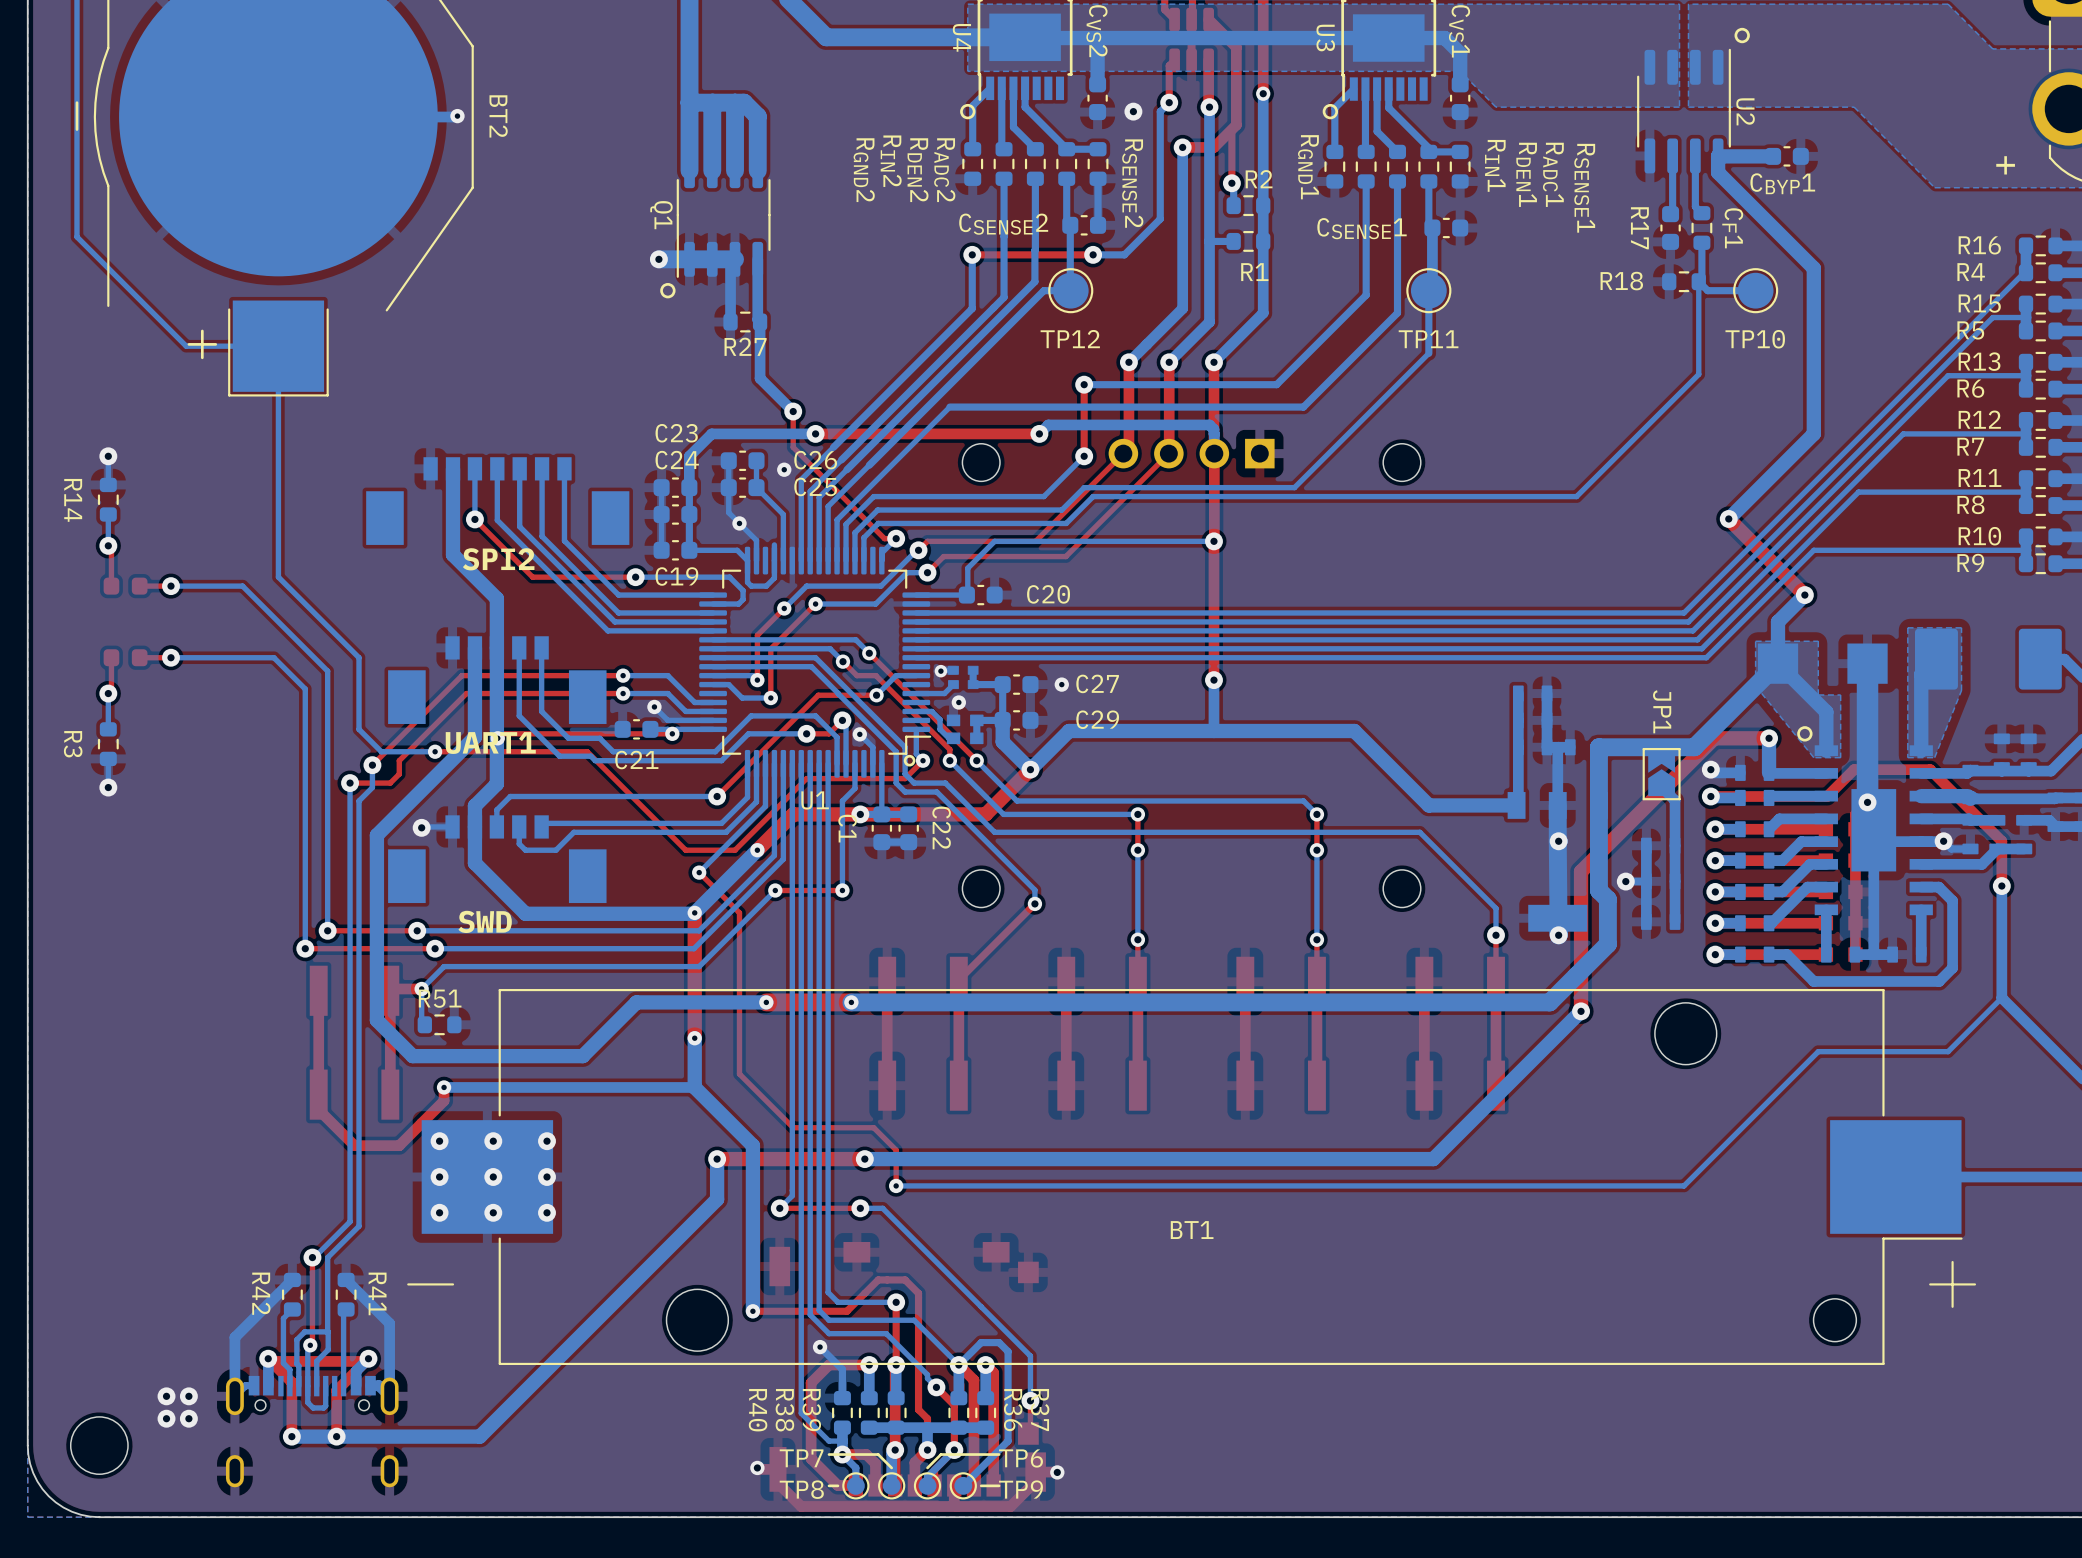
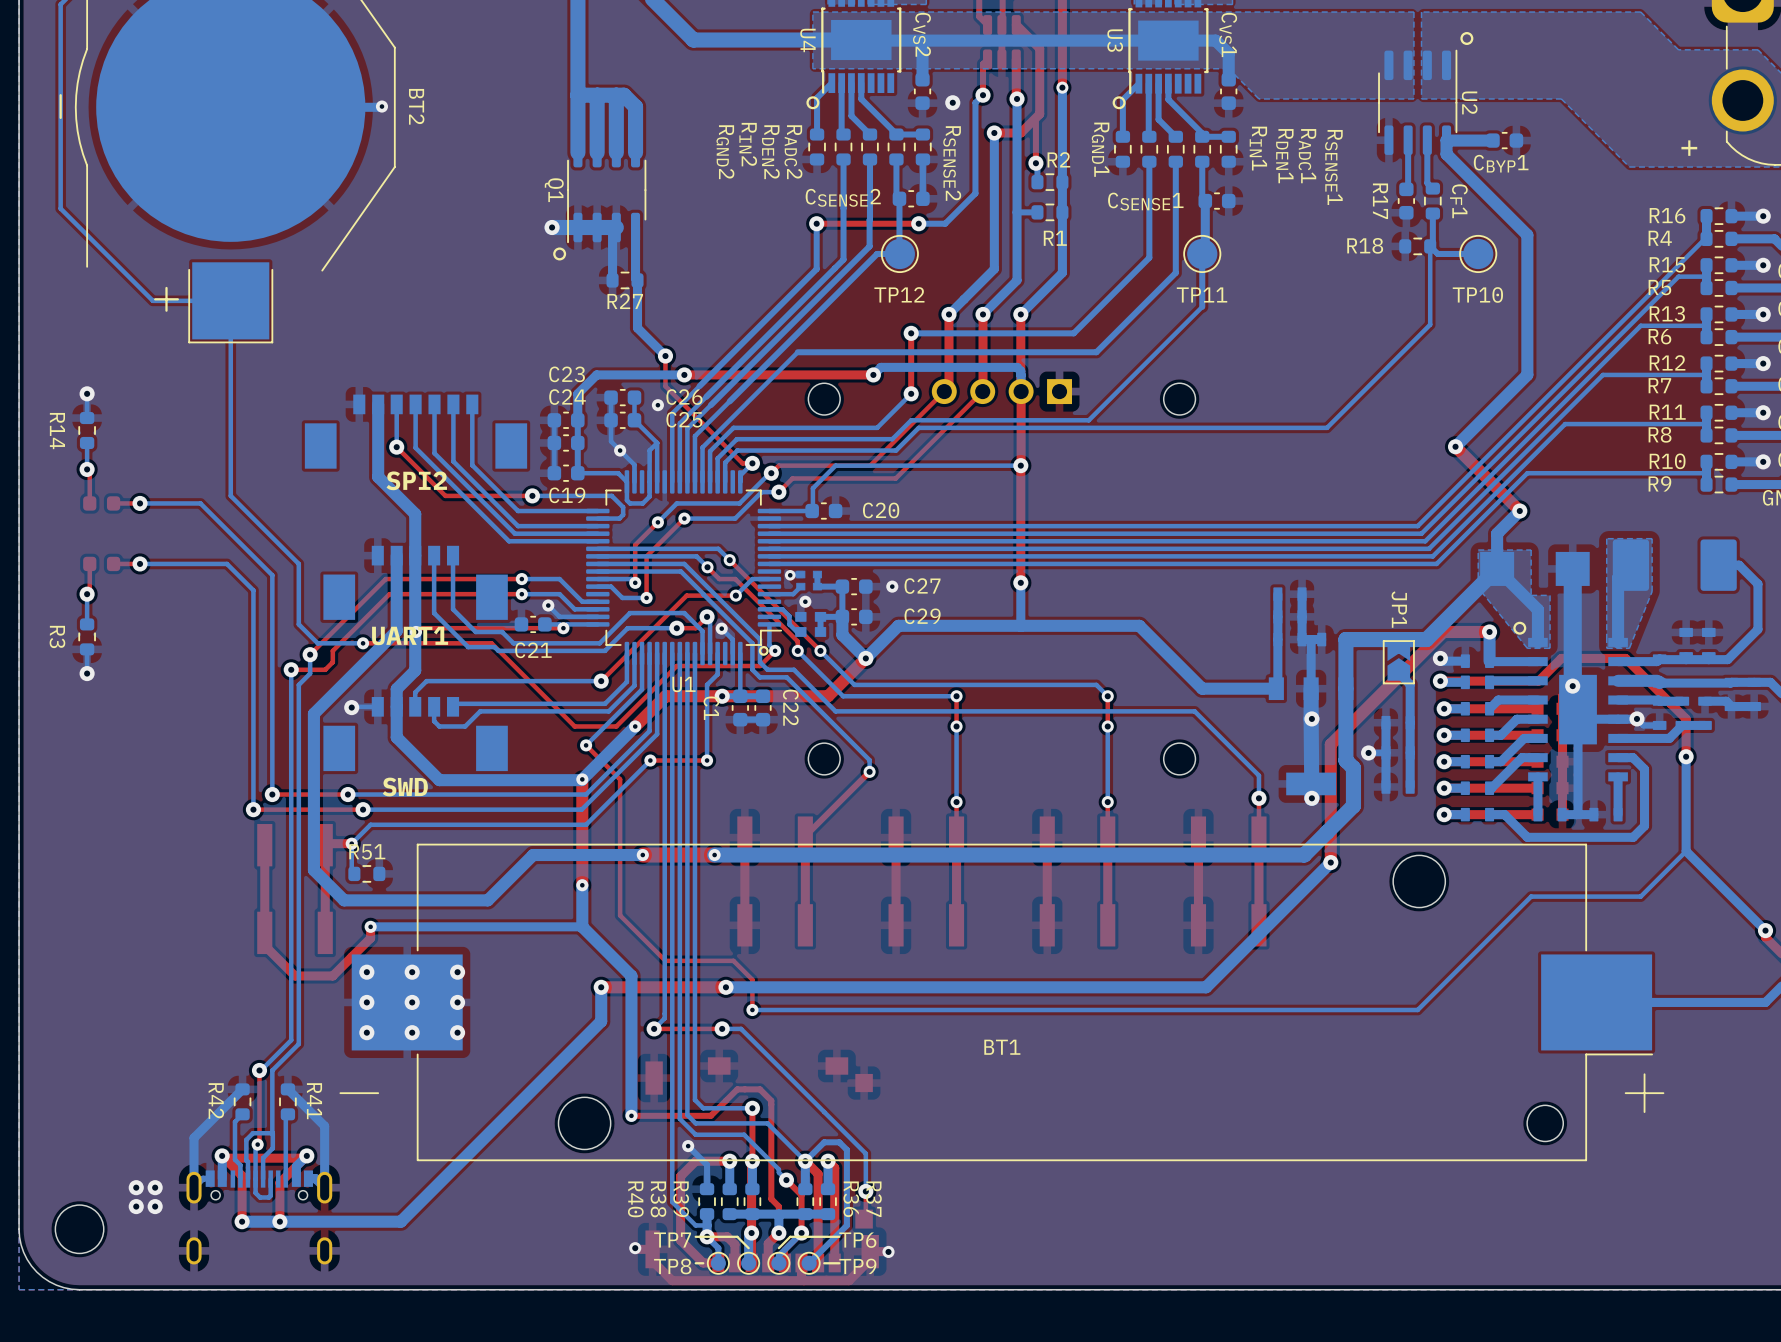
bottom track: none -> (657, 442) (649, 450) (649, 468)

